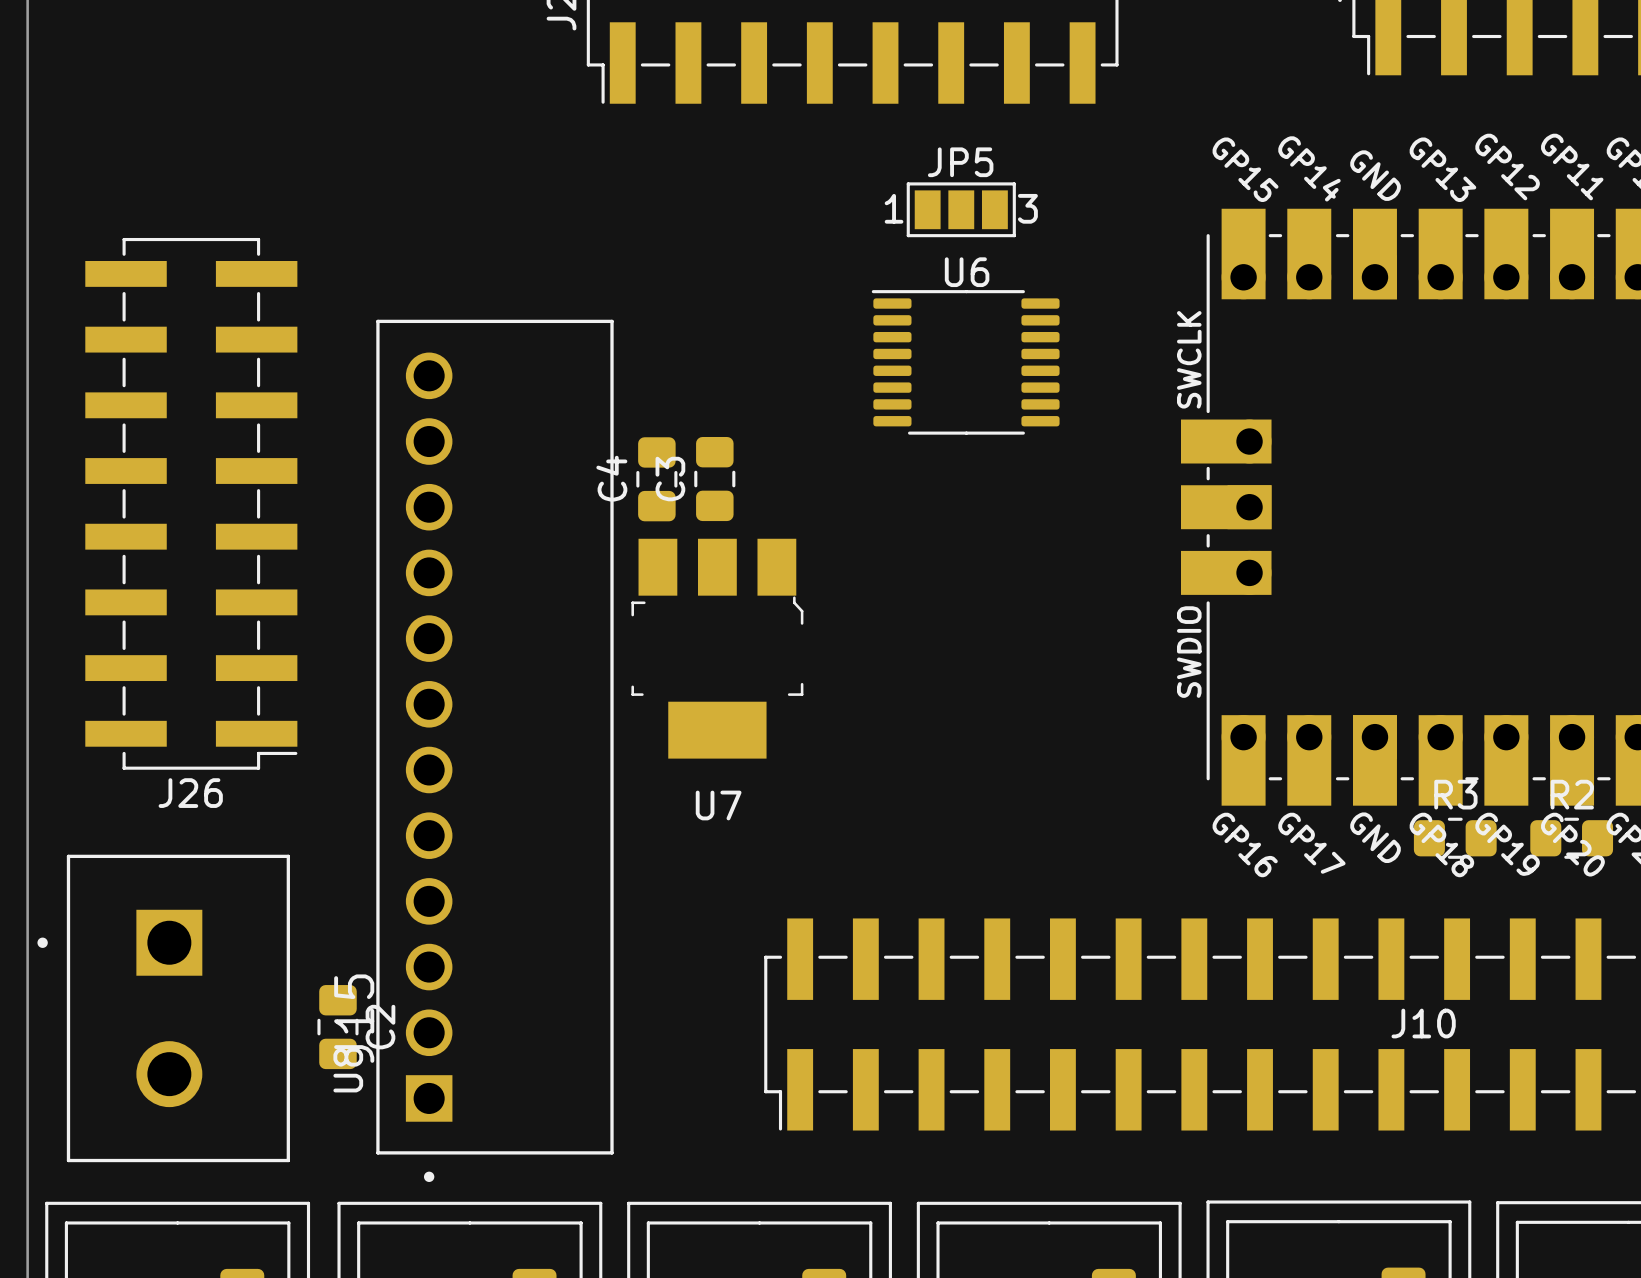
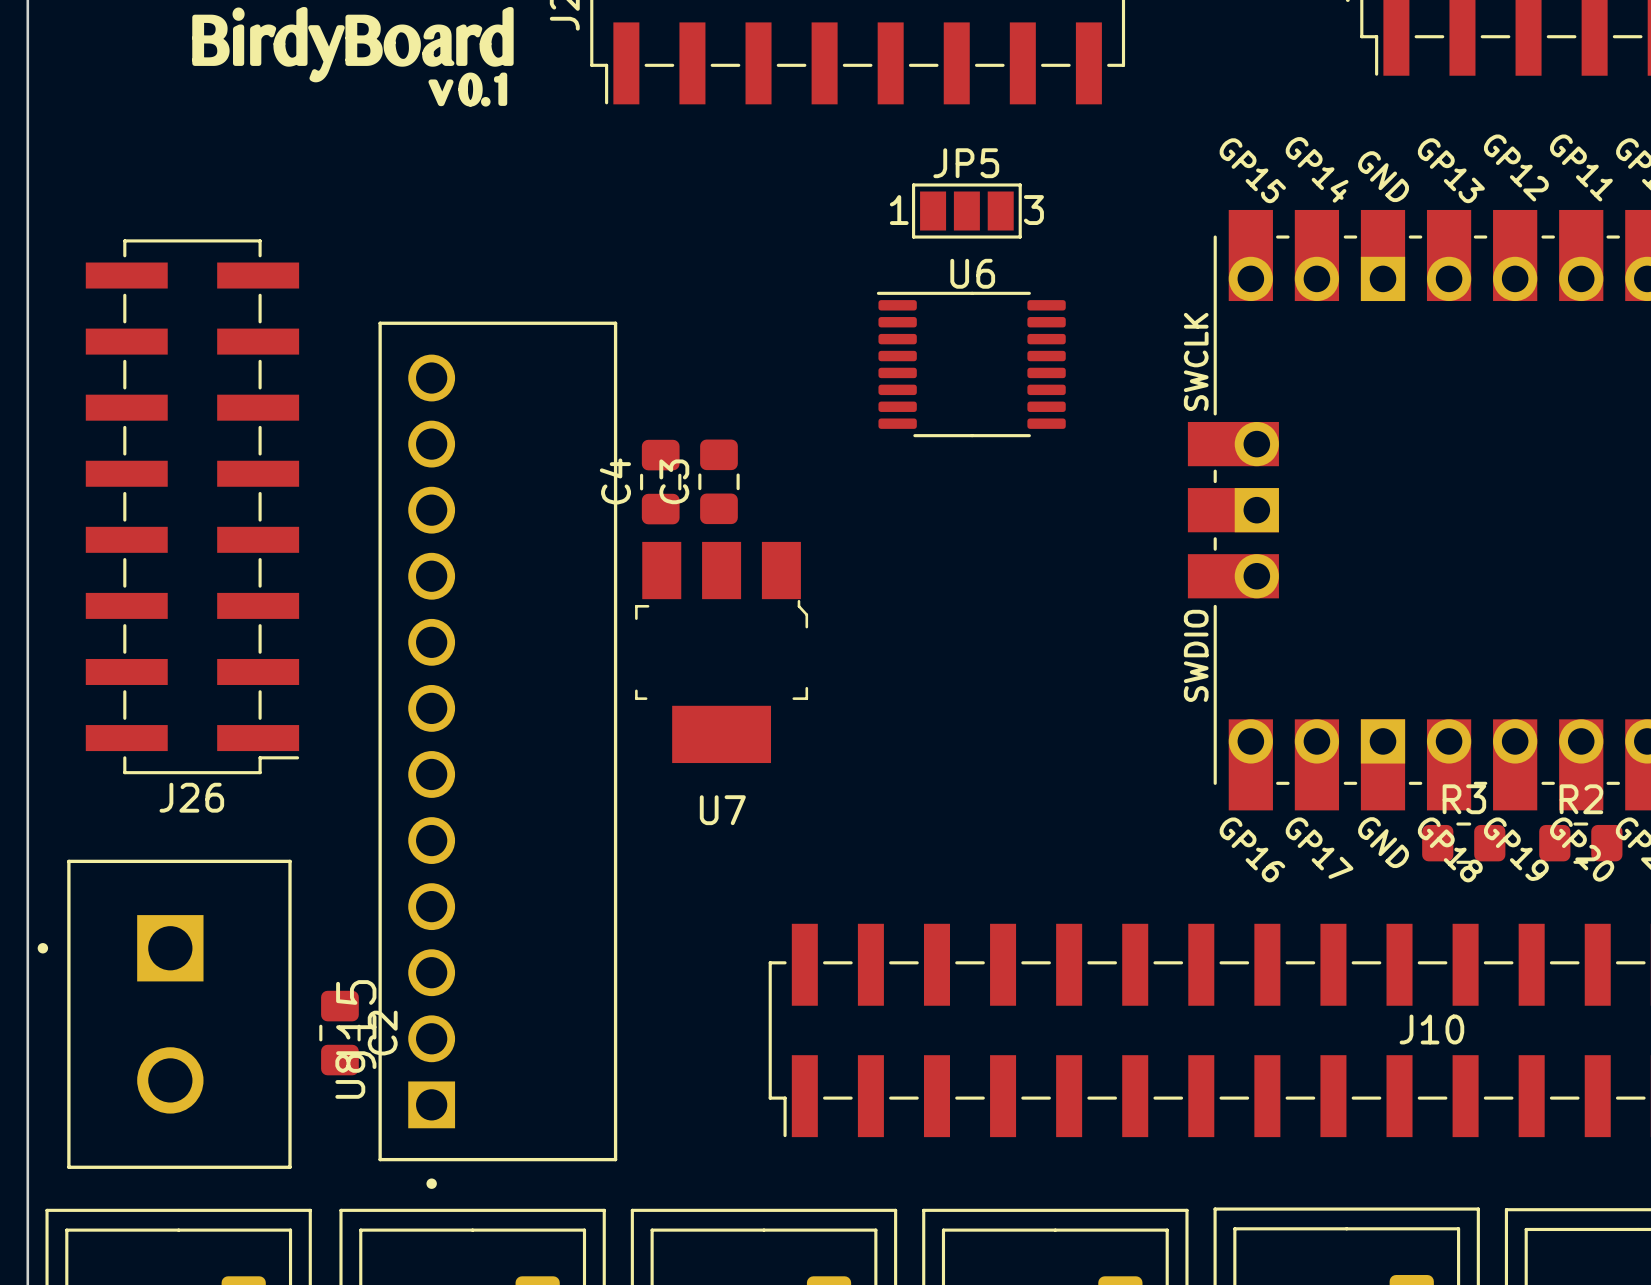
drawing: none -> [192, 7, 514, 107]

